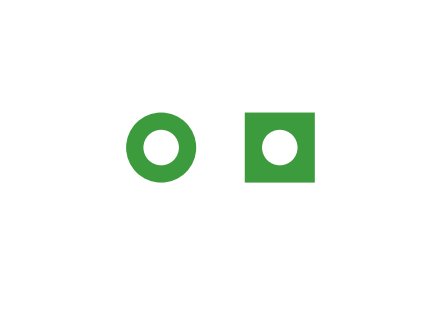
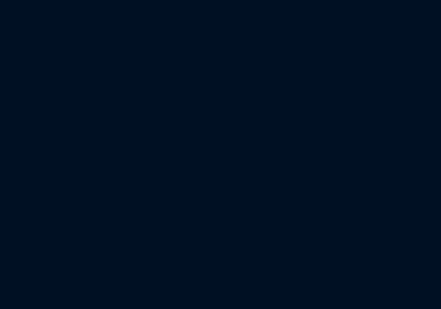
part: (220, 147) -> none

